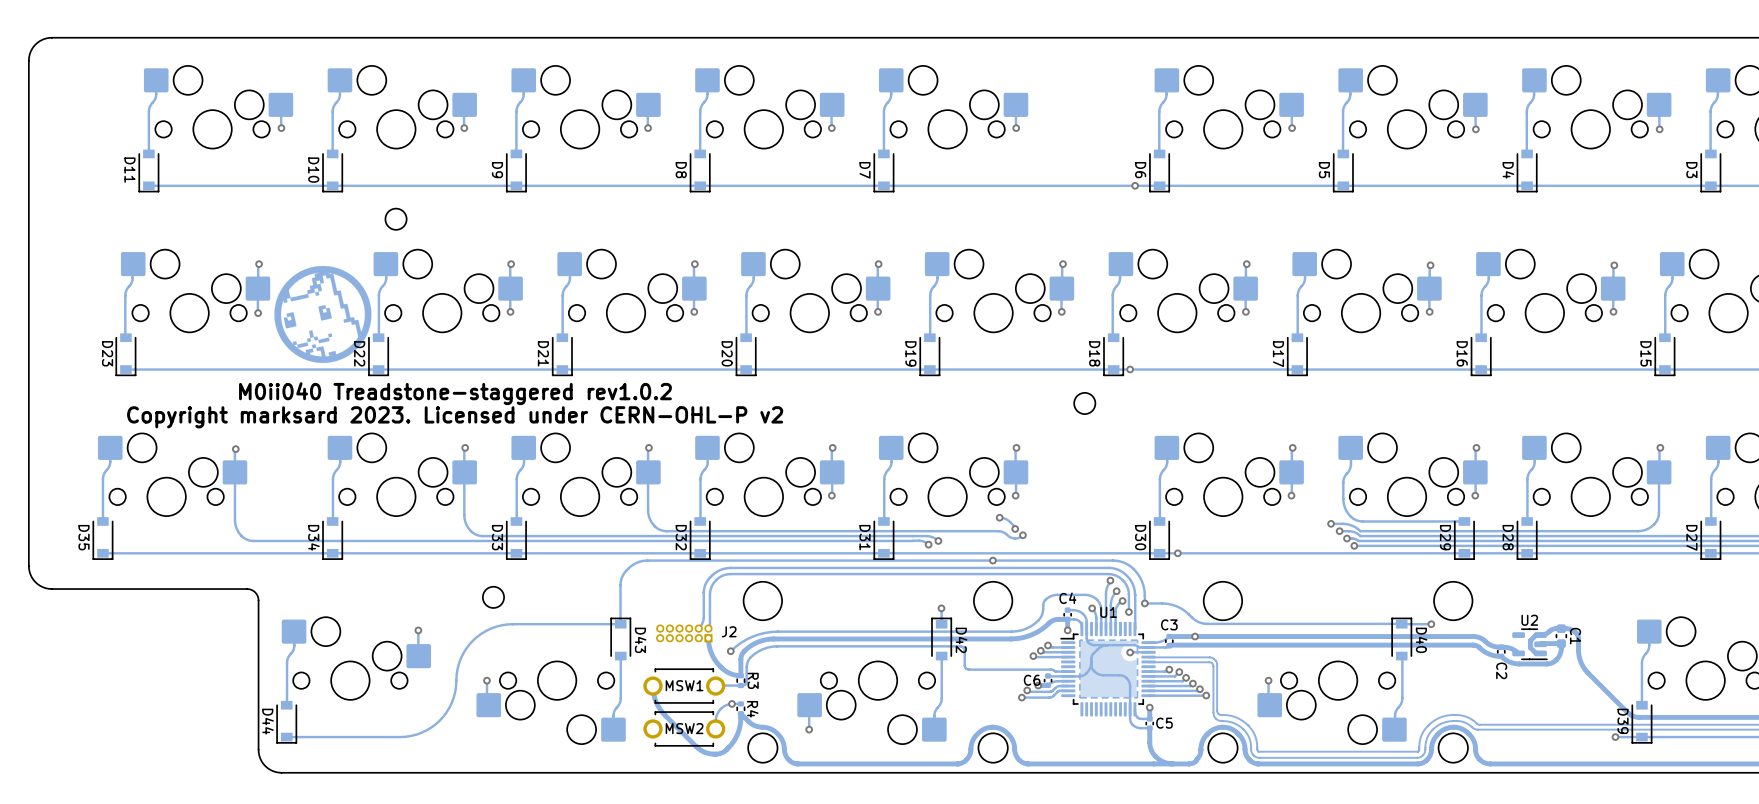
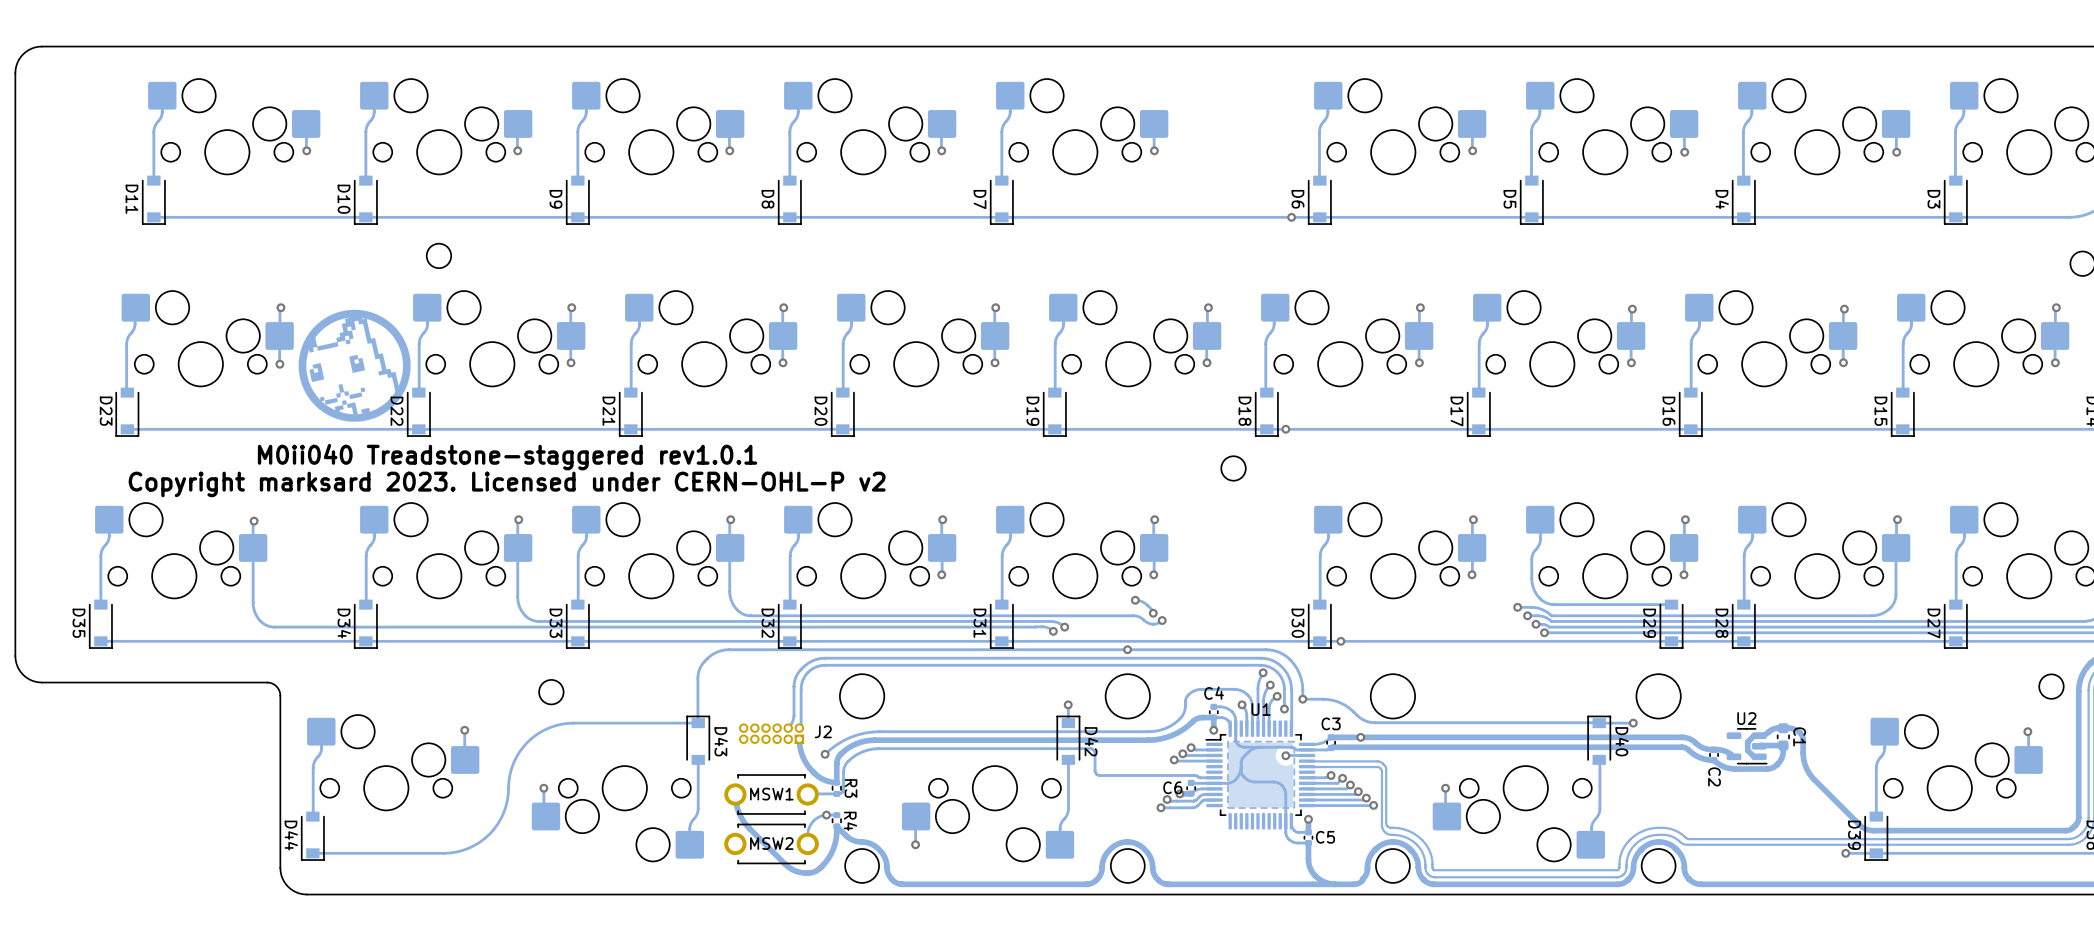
text: M0ii040 Treadstone-staggered rev1.0.2 (455, 393) -> M0ii040 Treadstone-staggered rev1.0.1 (507, 457)

